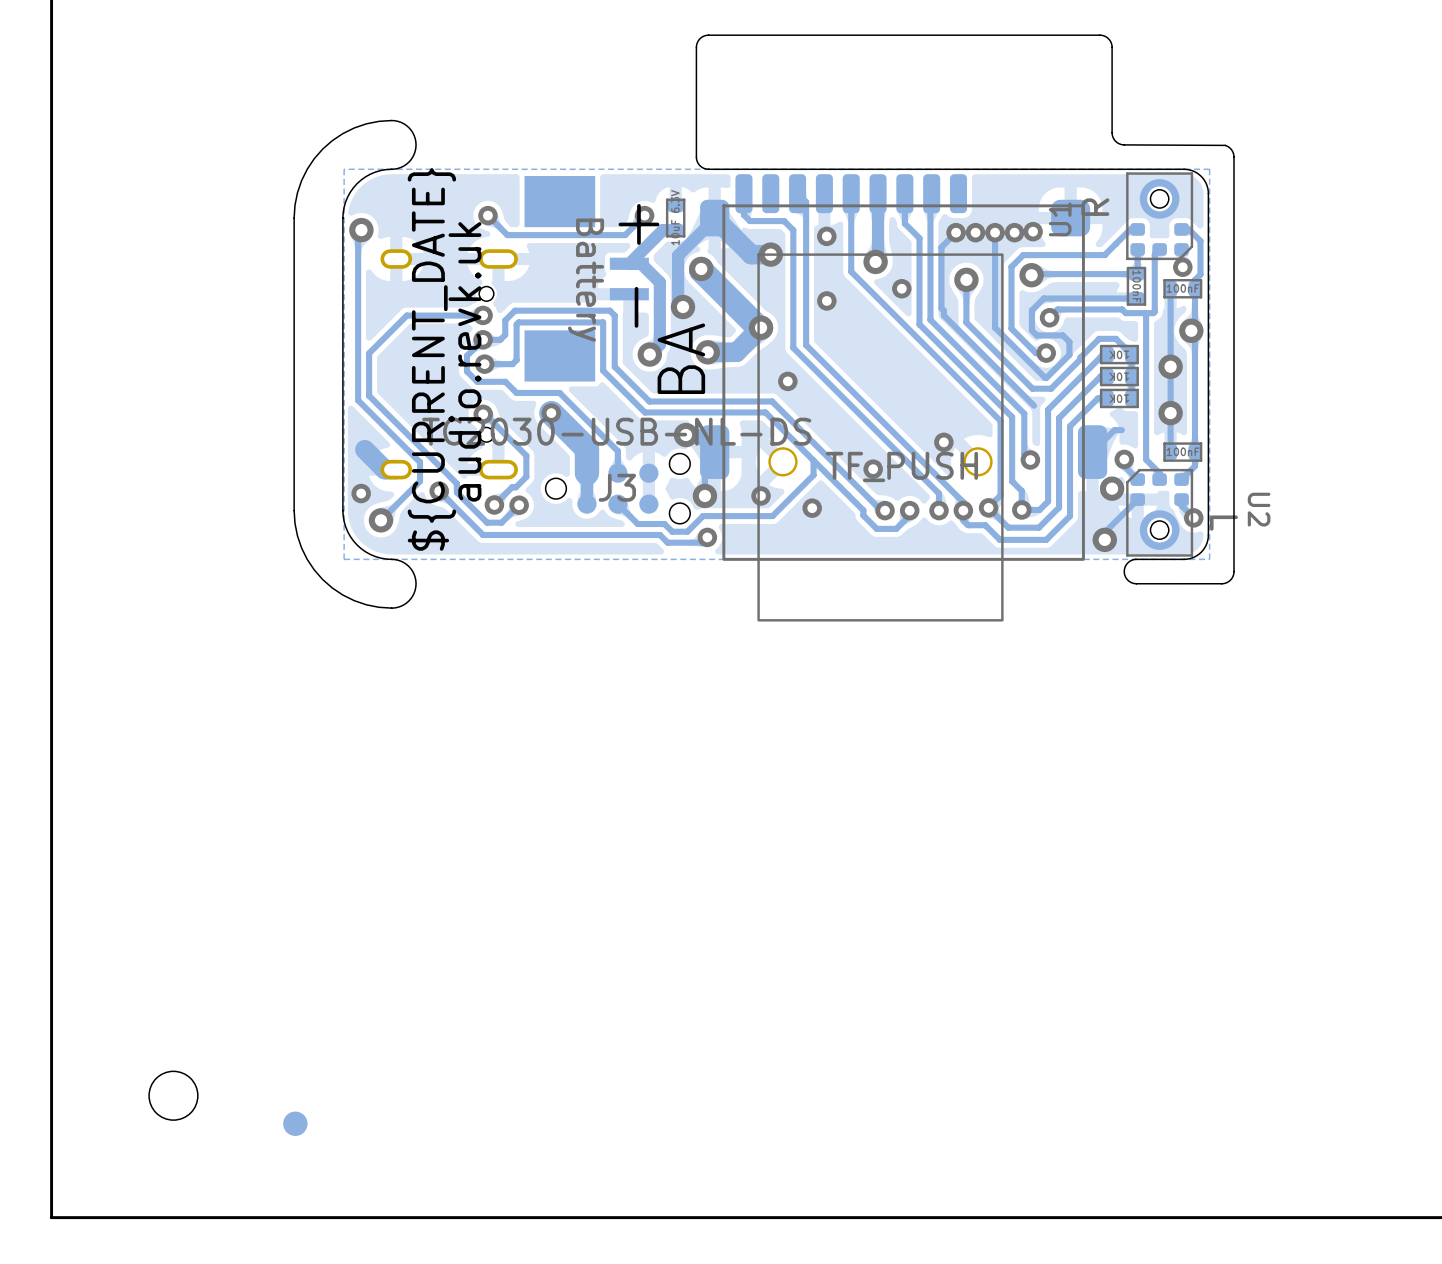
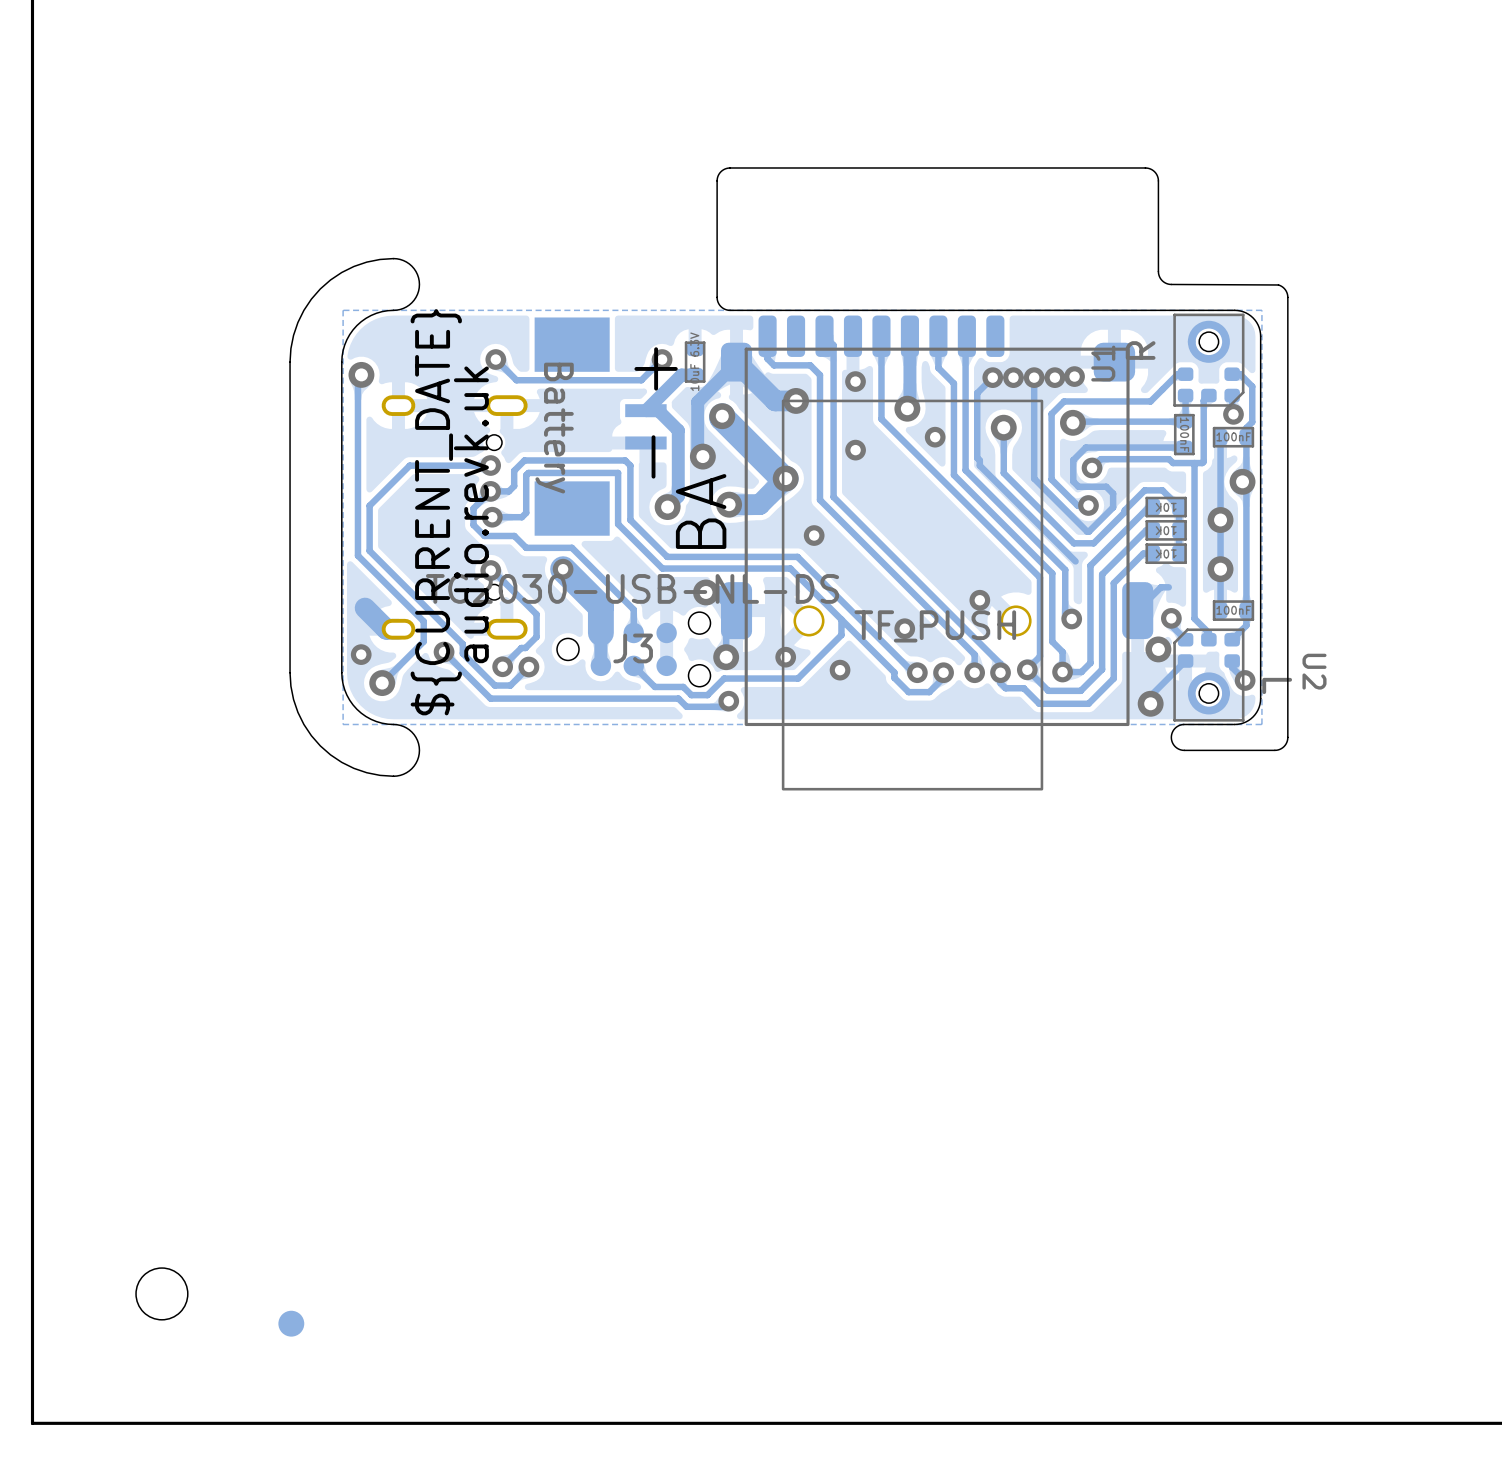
part value position: Battery (585, 280) -> Battery (554, 428)

